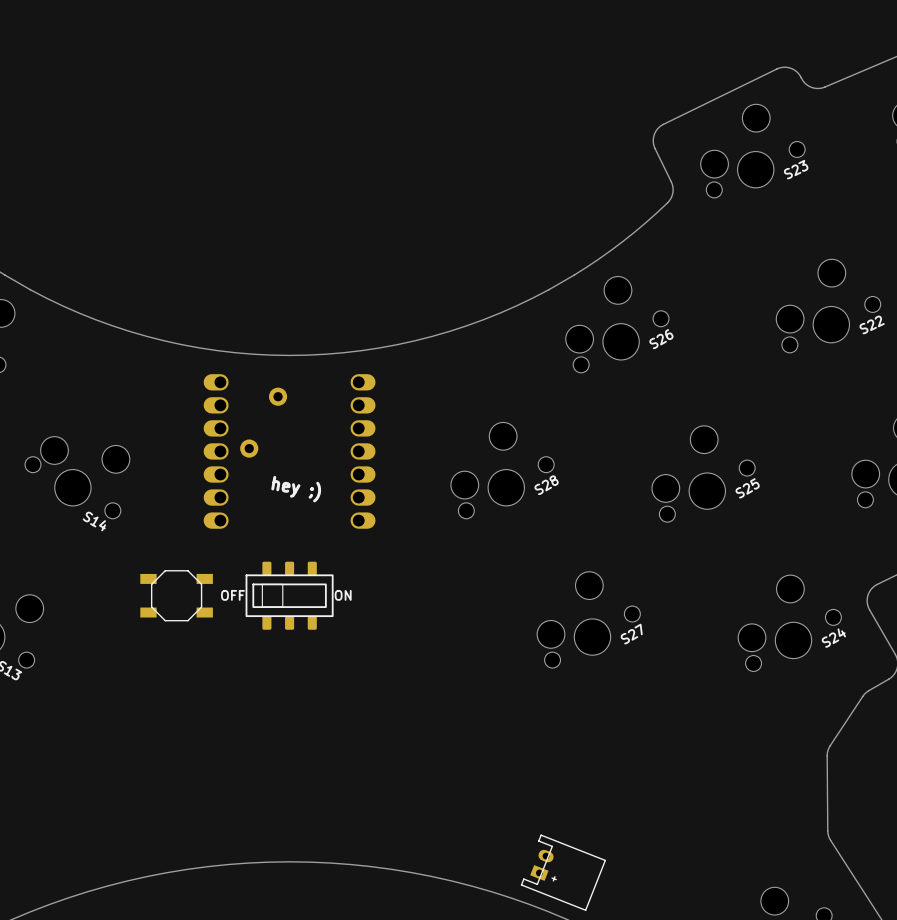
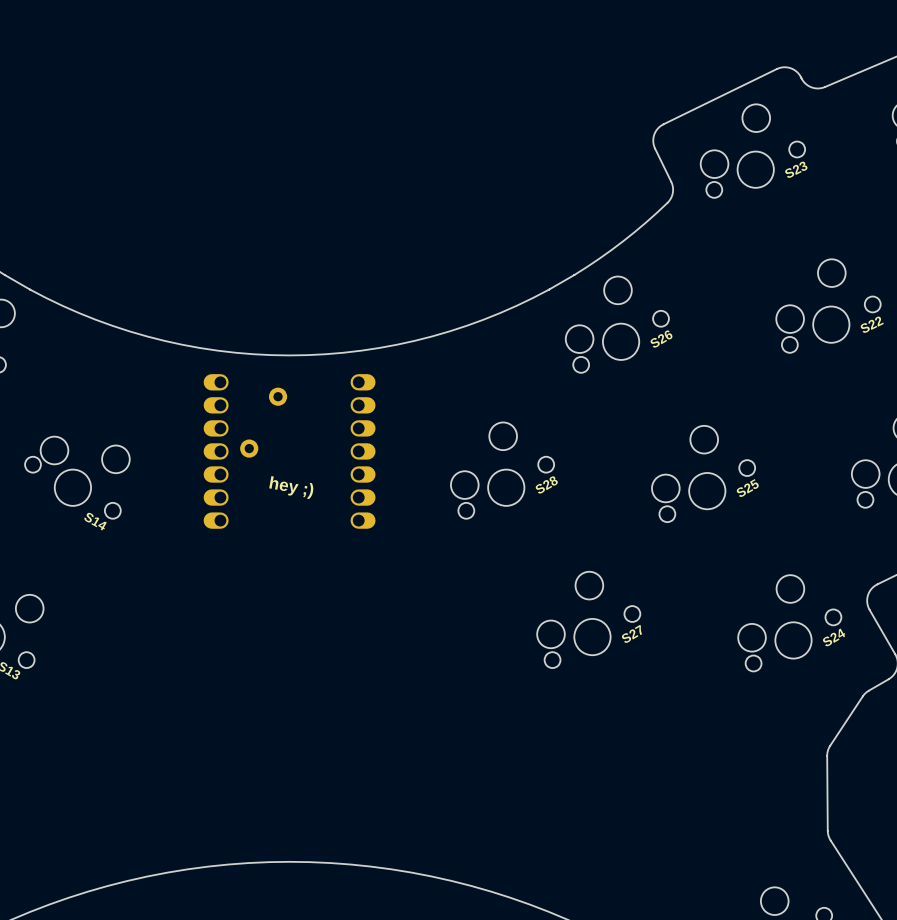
part: (176, 595) -> none
part: (289, 595) -> none
part: (563, 872) -> none

